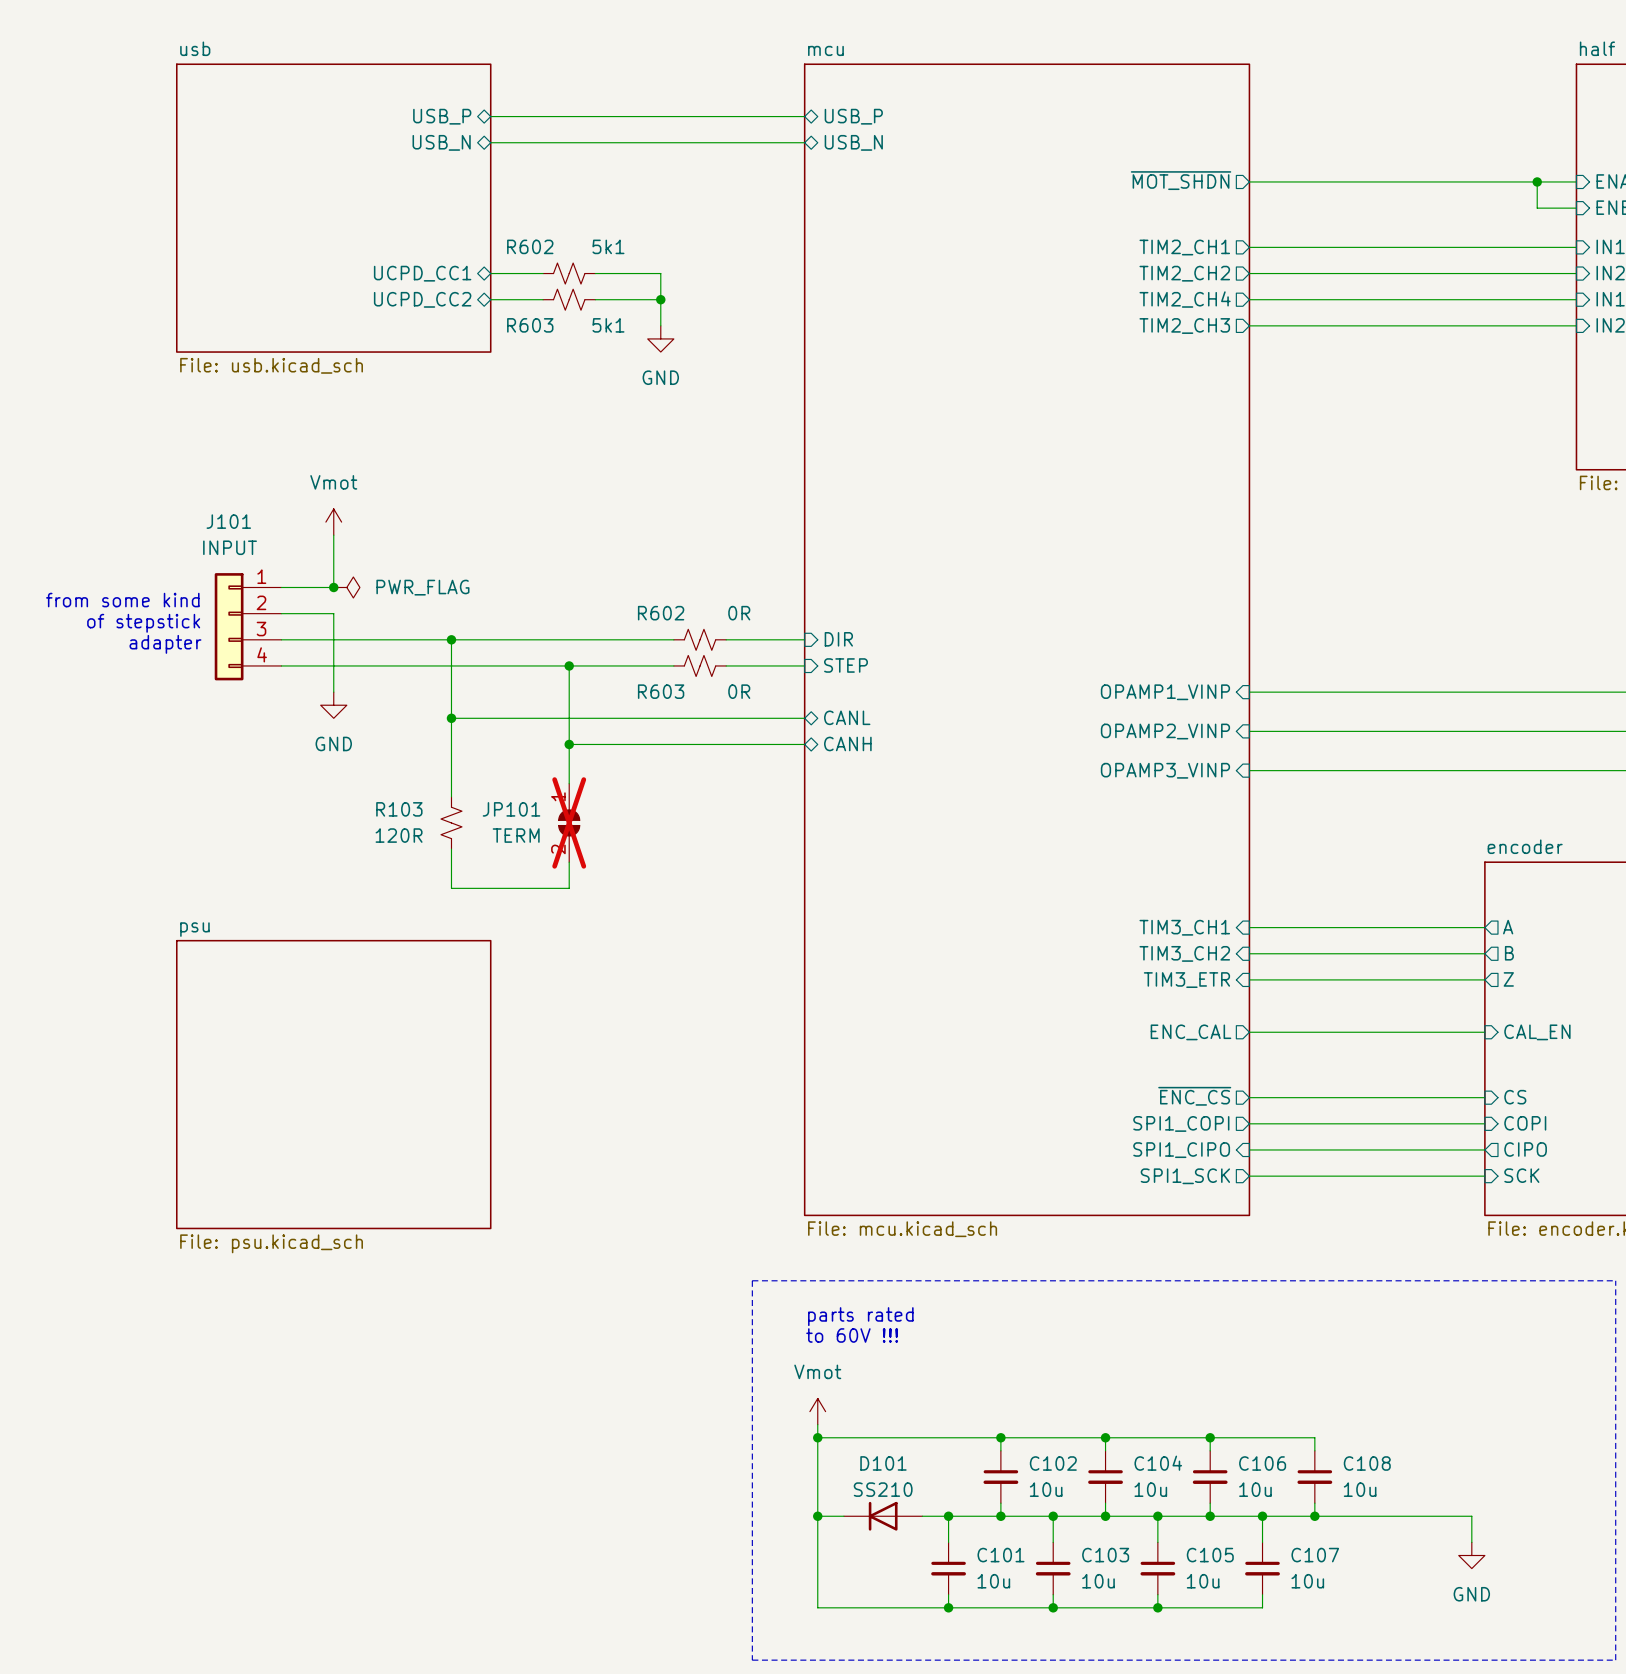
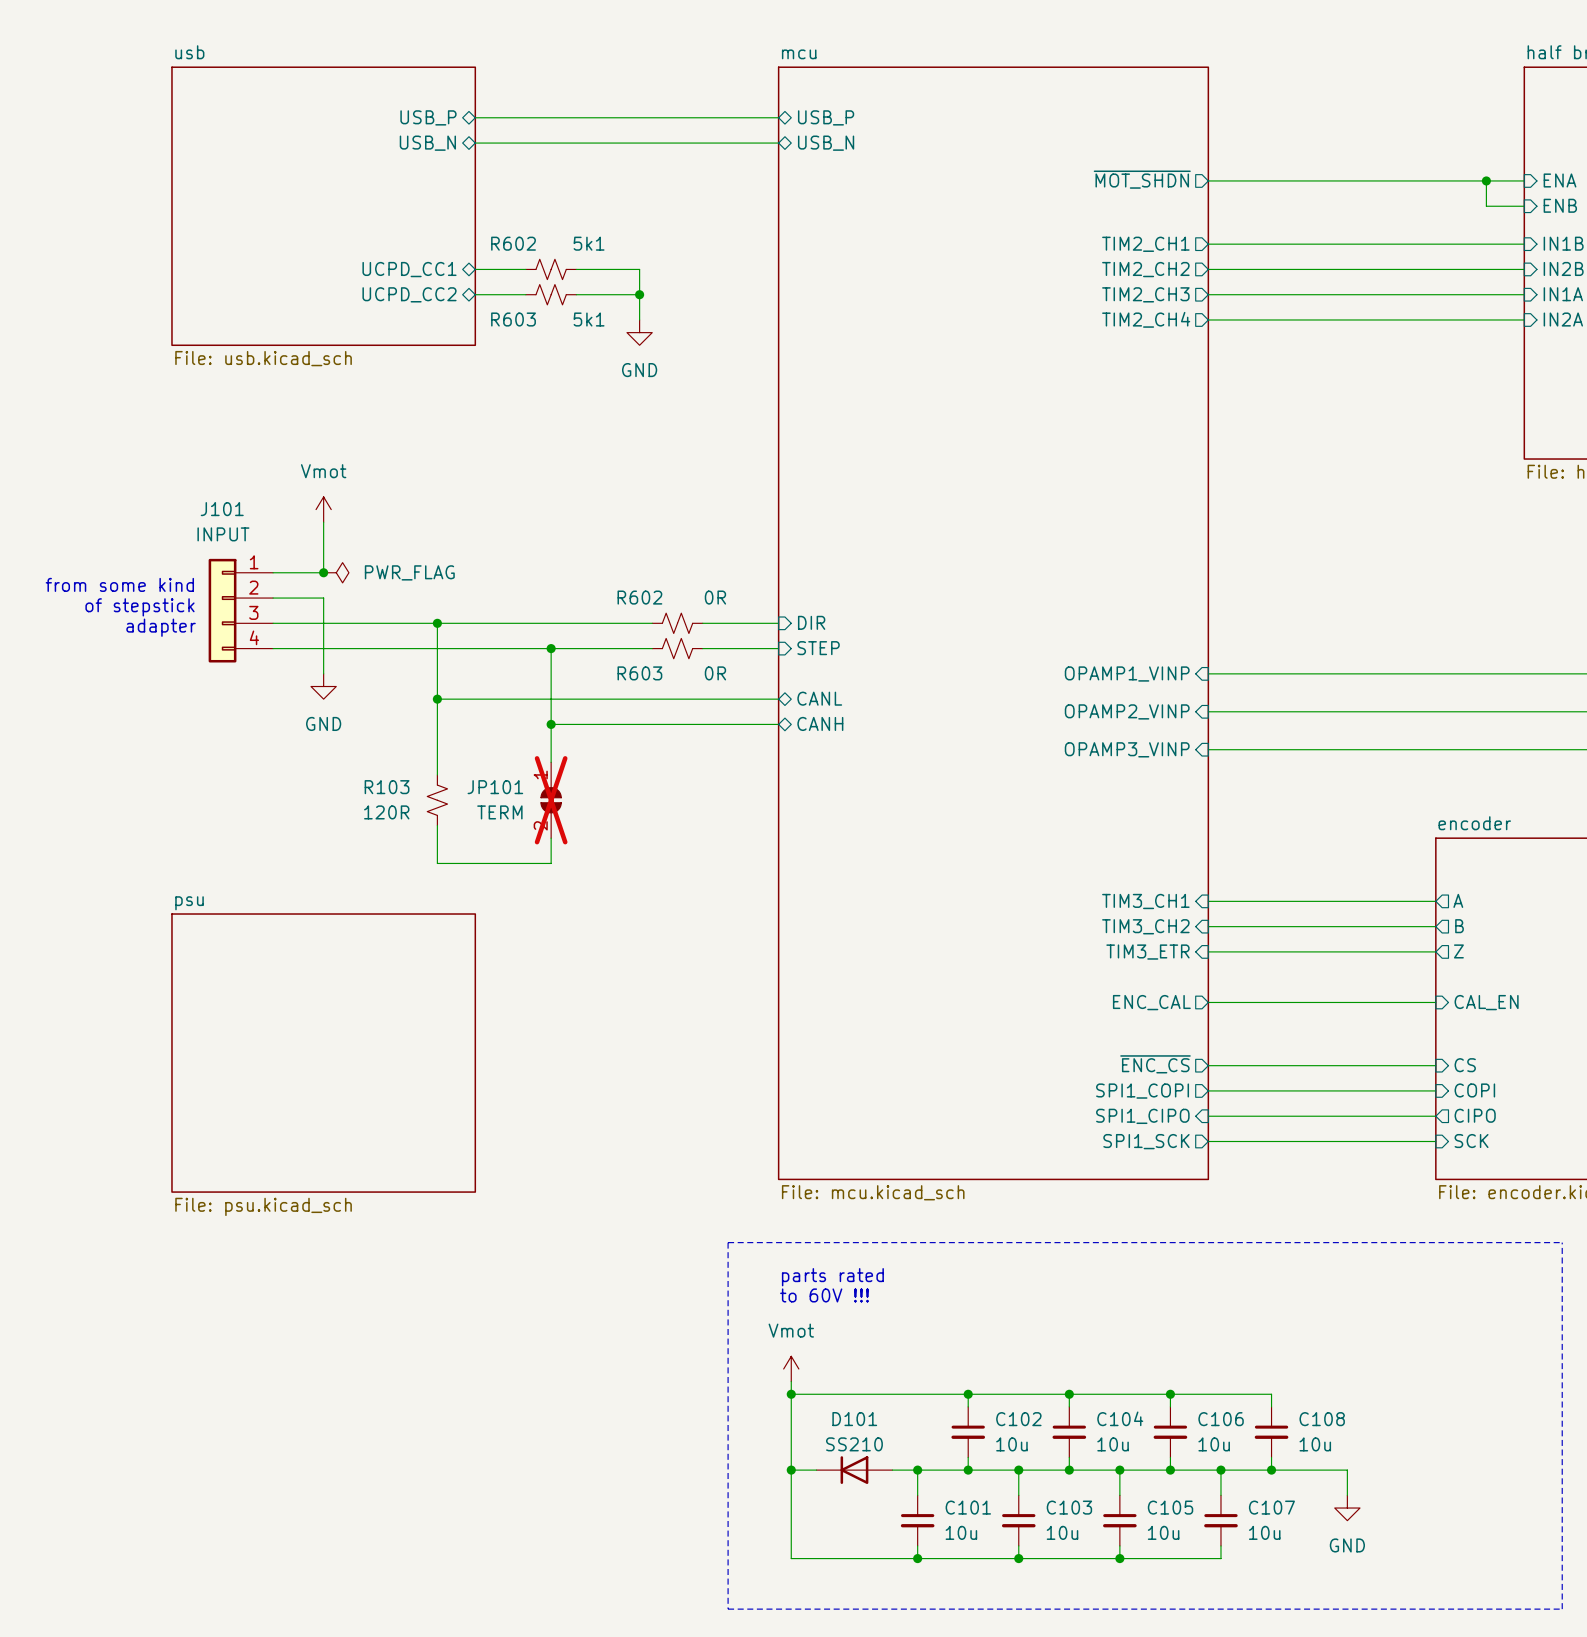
sheet pin: TIM2_CH4 (1185, 299) -> TIM2_CH3 (1145, 294)
sheet pin: TIM2_CH3 (1184, 326) -> TIM2_CH4 (1146, 319)
wire: (1393, 1516) (1471, 1516) (1471, 1542) -> (1347, 1470) (1347, 1495)
power symbol position: GND (1471, 1555) -> GND (1347, 1508)

